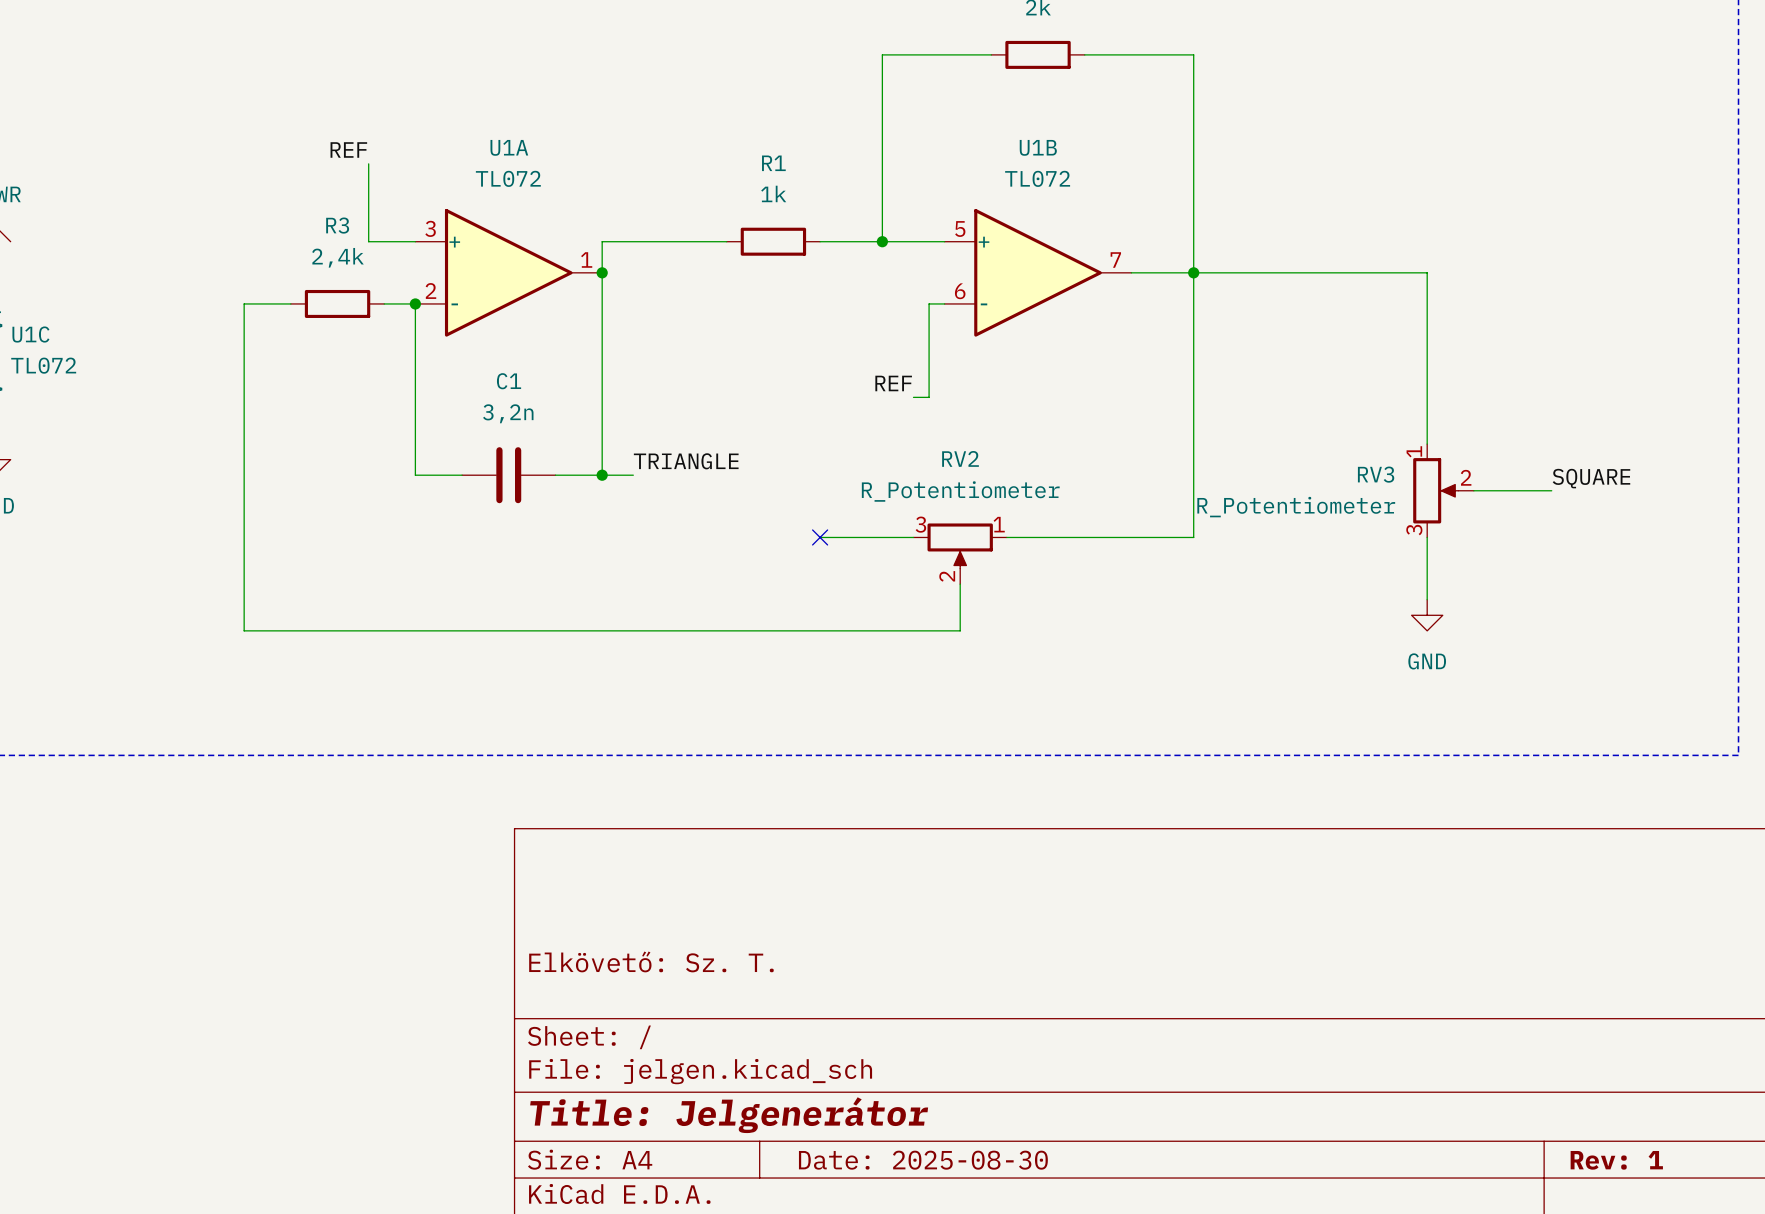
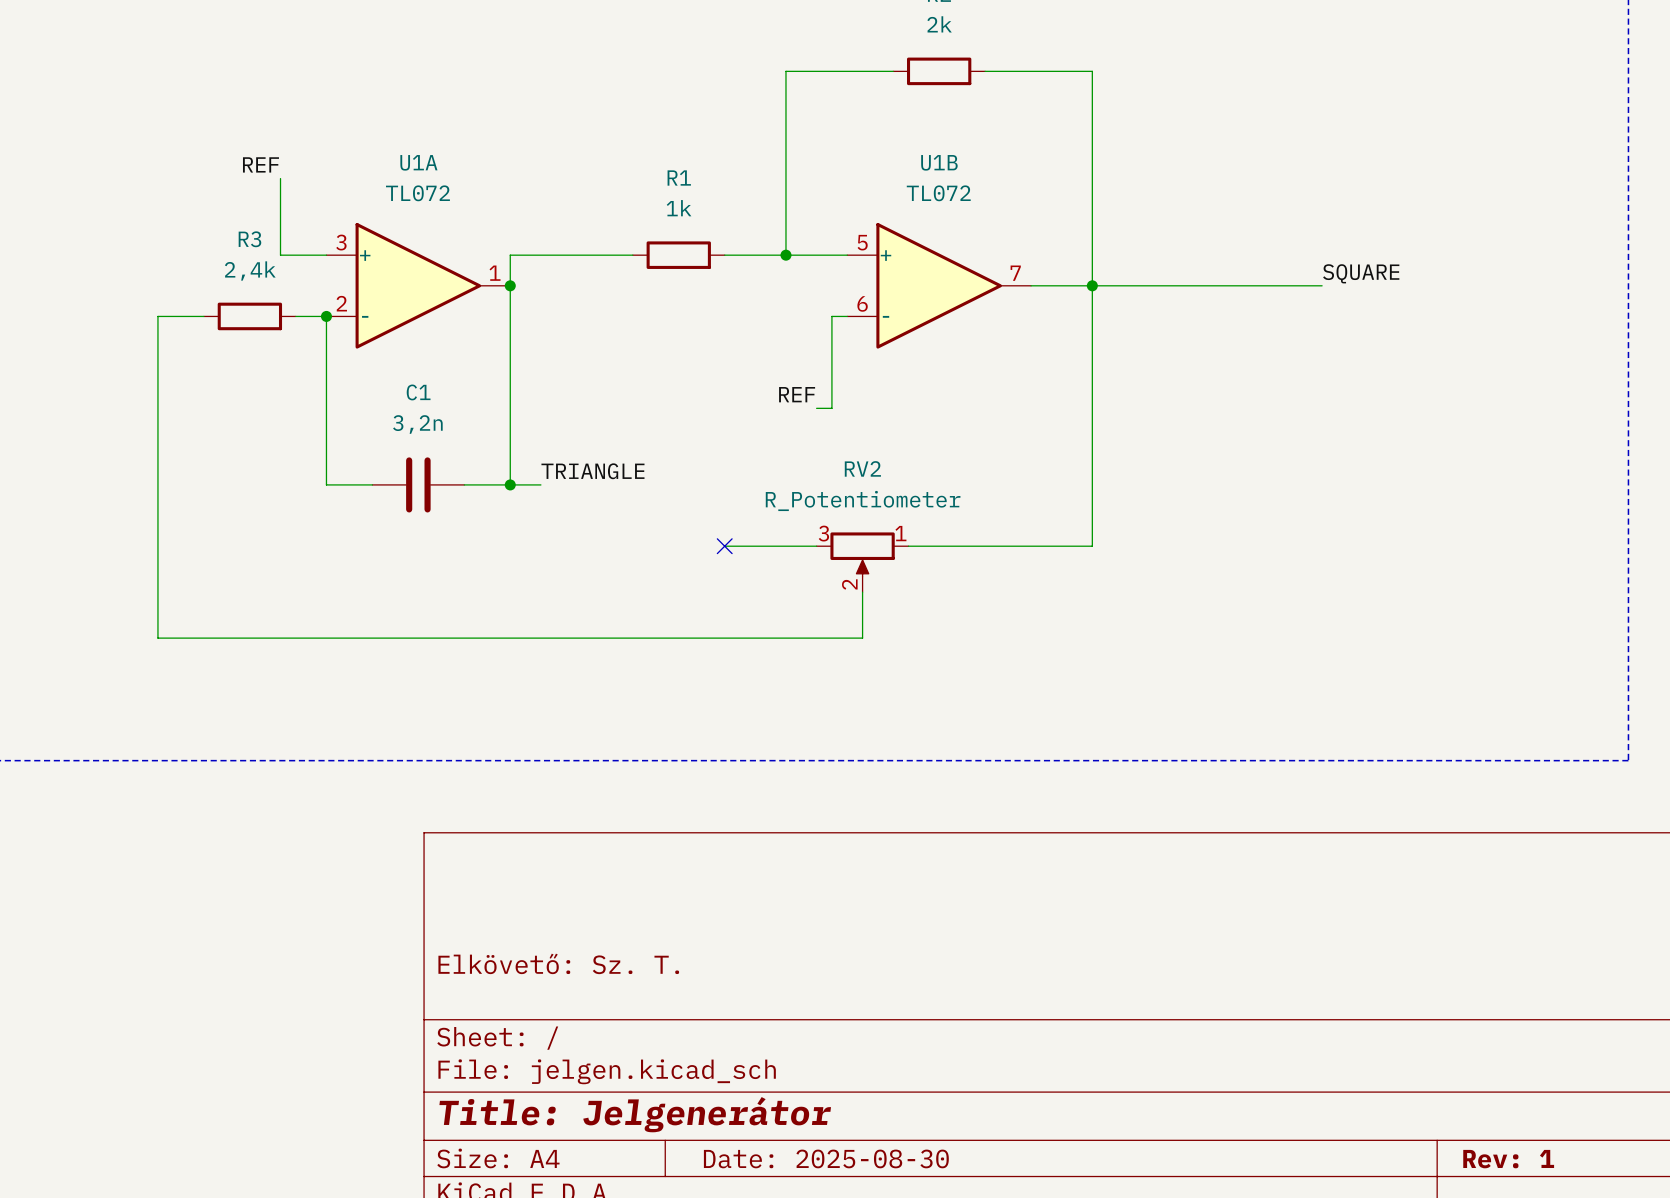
wire: (1427, 272) (1427, 444) -> none
label position: SQUARE (1591, 478) -> SQUARE (1361, 273)
RV3: R_Potentiometer (1443, 490) -> none
wire: (1473, 490) (1551, 490) -> none
wire: (1427, 537) (1427, 599) -> none
power symbol: GND (1427, 615) -> none

